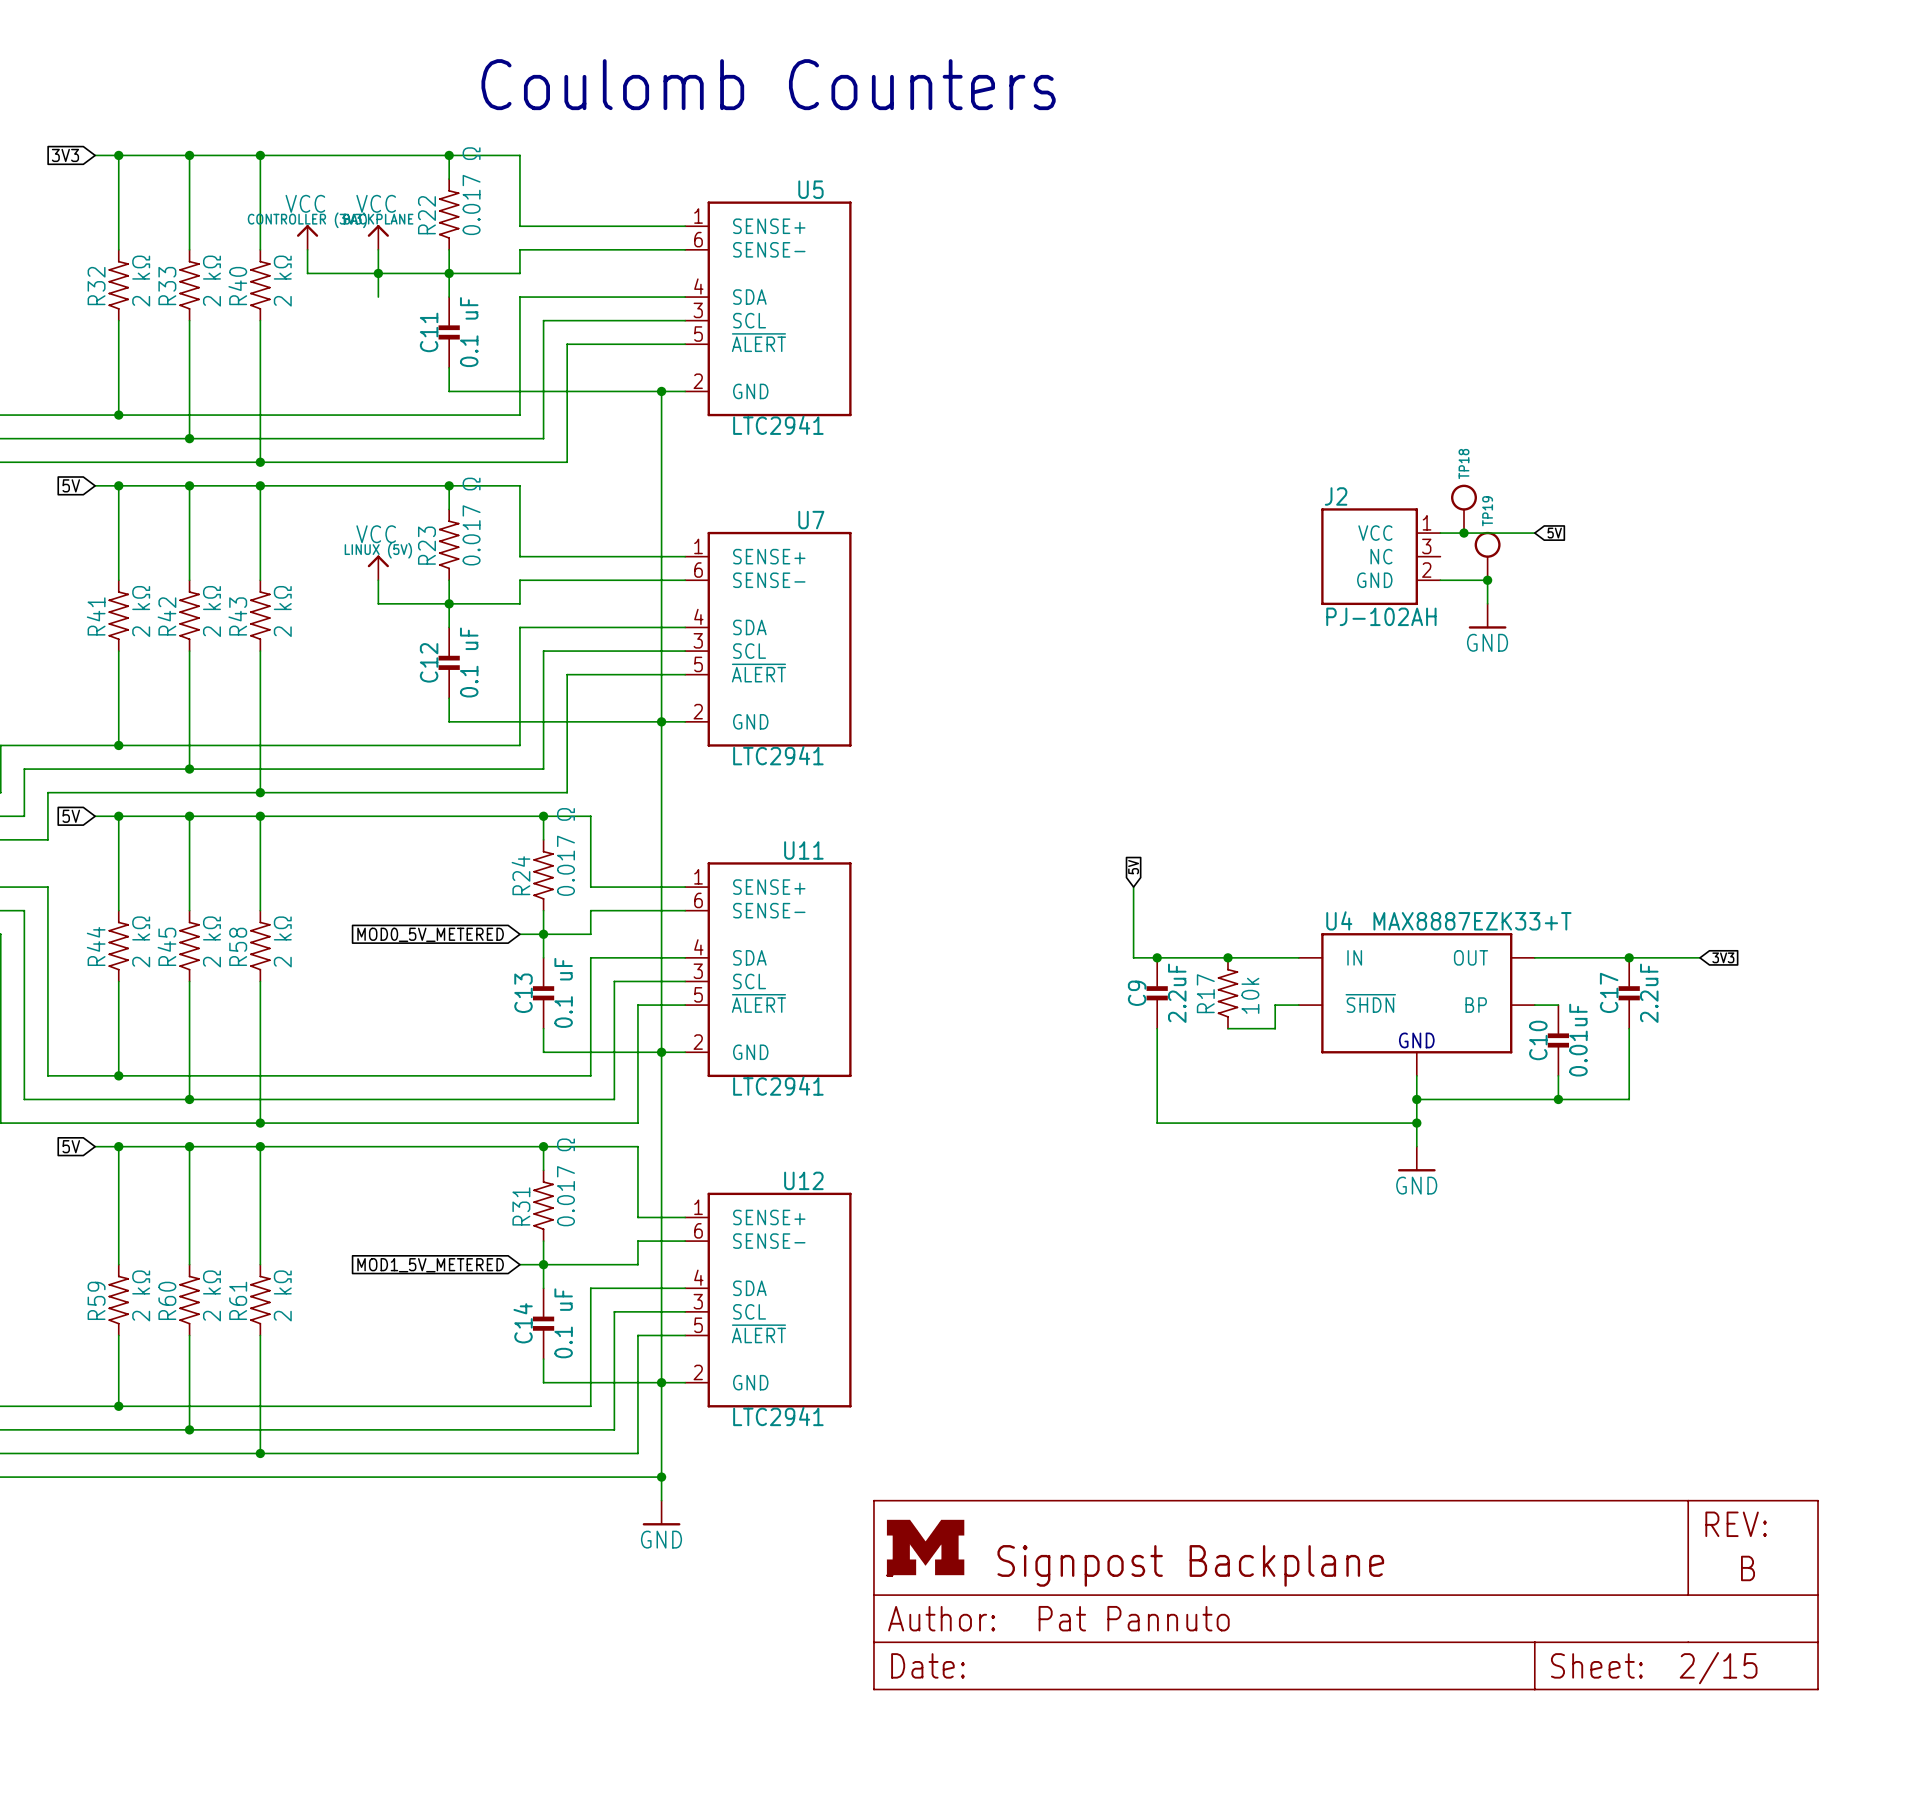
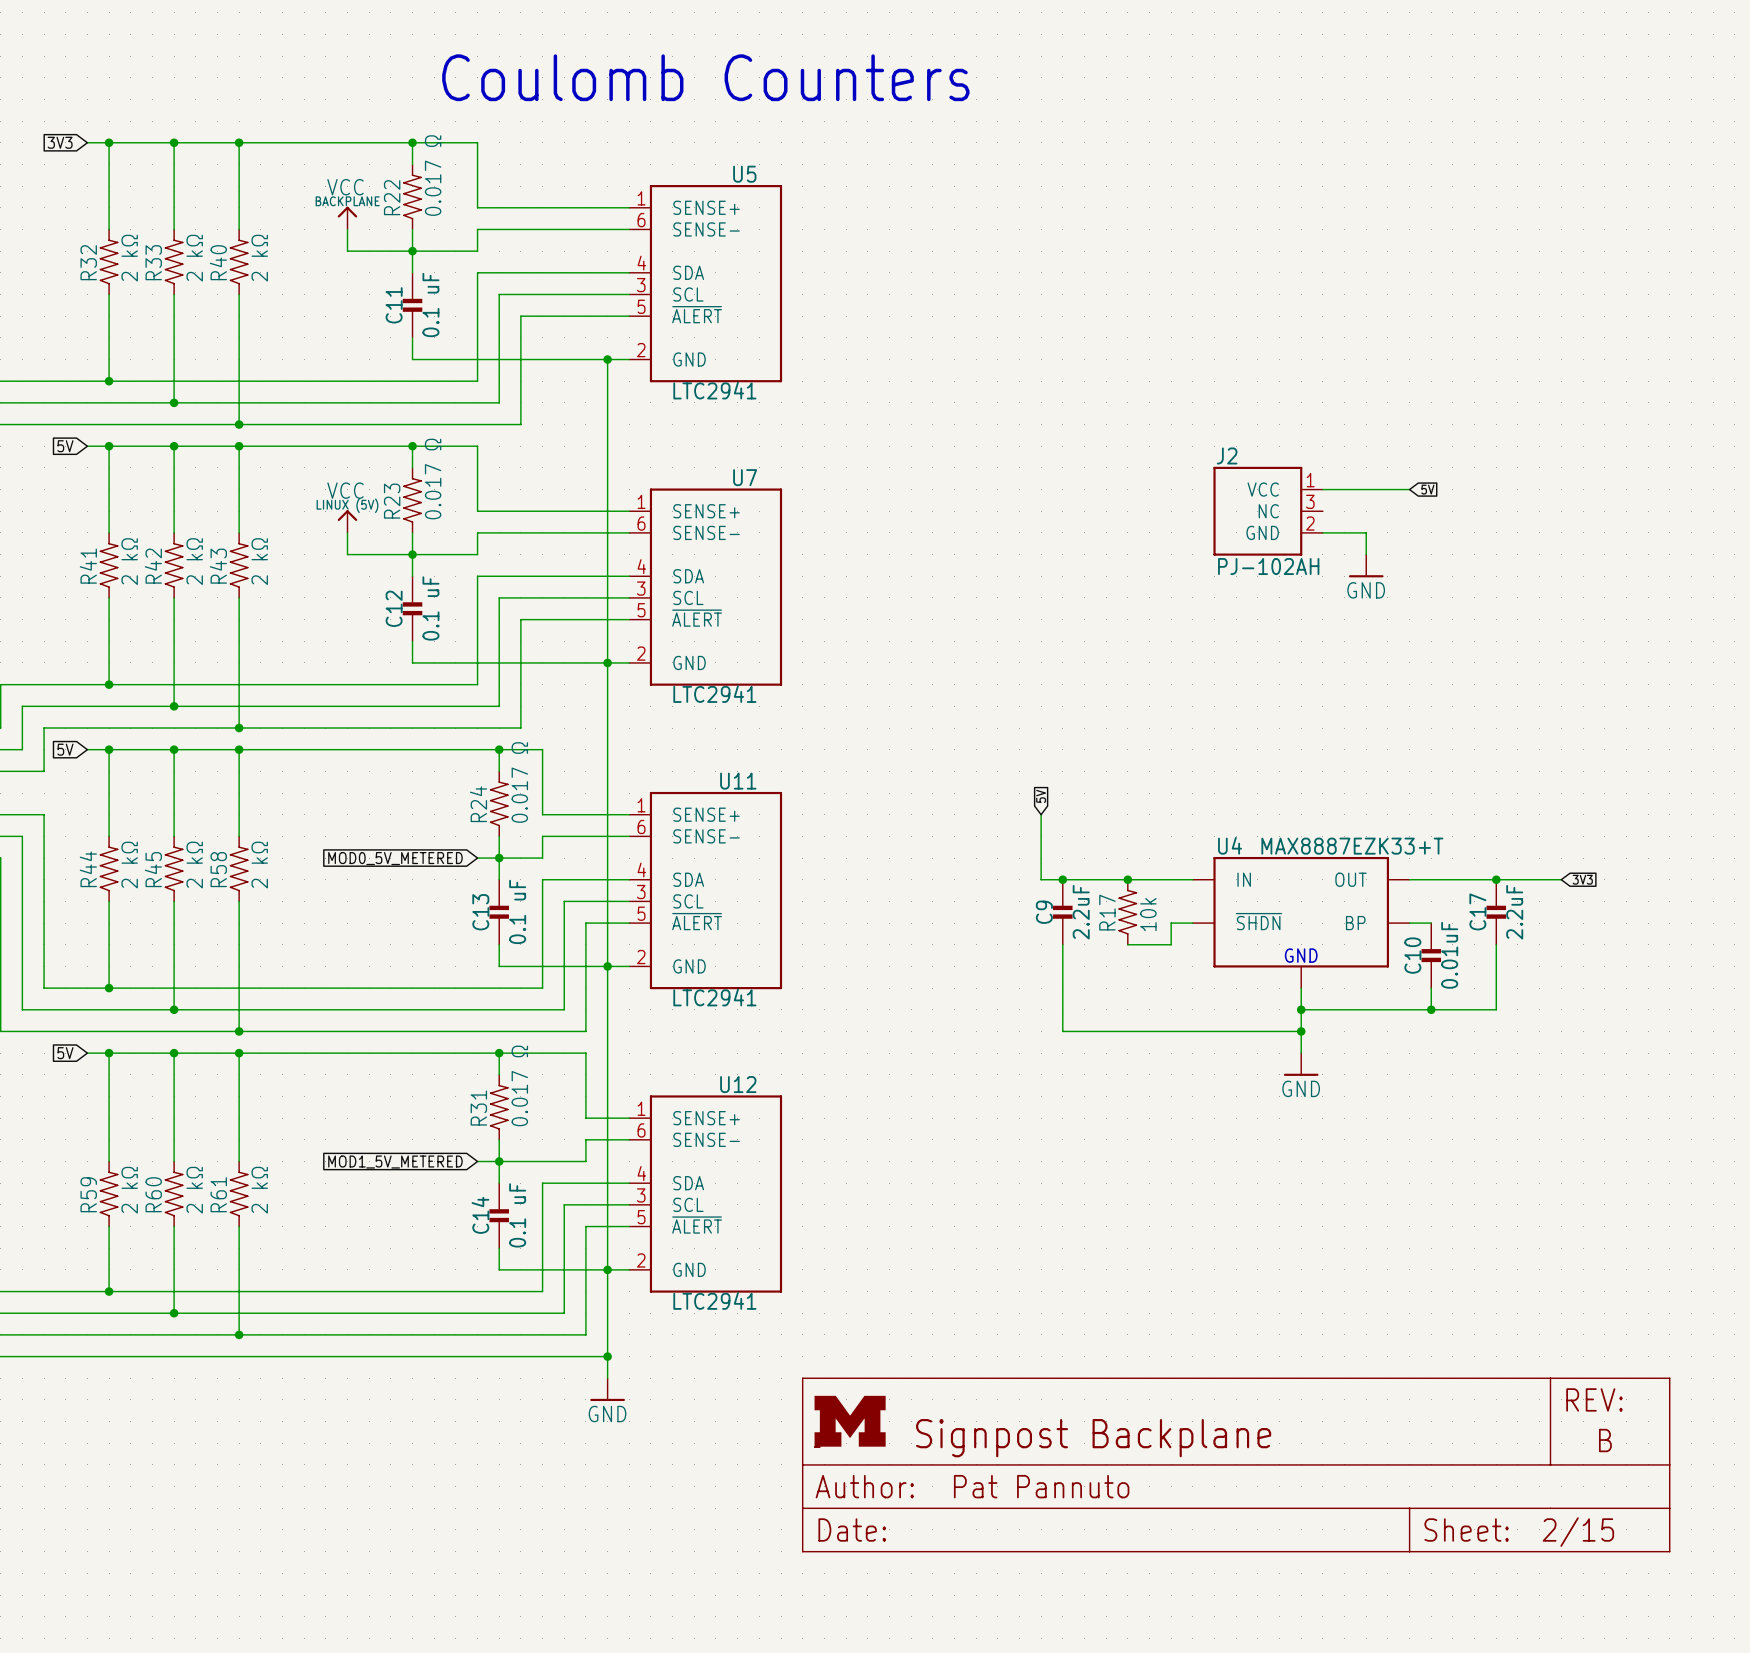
power symbol: (307, 237) -> none
wire: (307, 249) (307, 273) (378, 273) (378, 297) -> none
junction: (378, 273) -> none
TP18: (1464, 508) -> none
junction: (1464, 533) -> none
TP19: (1487, 556) -> none
junction: (1487, 580) -> none

